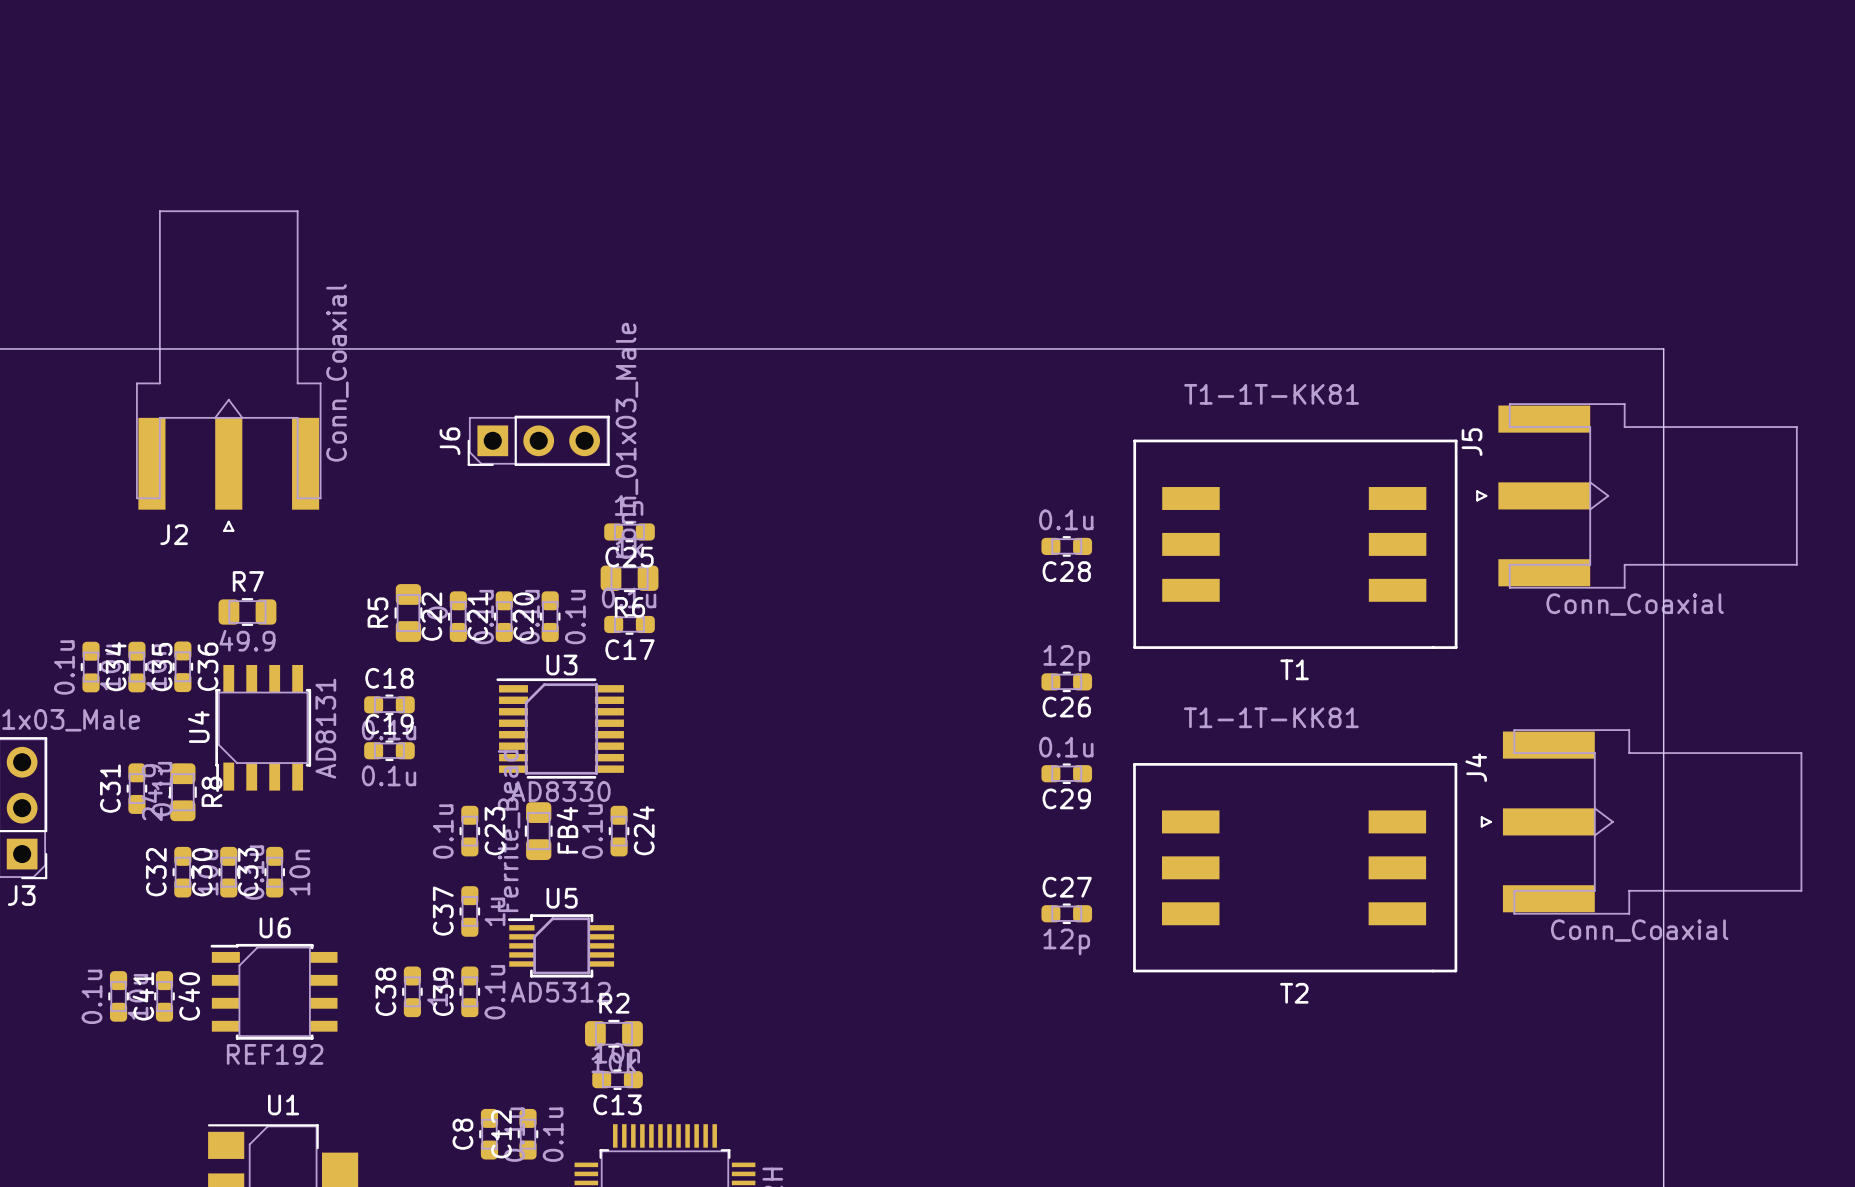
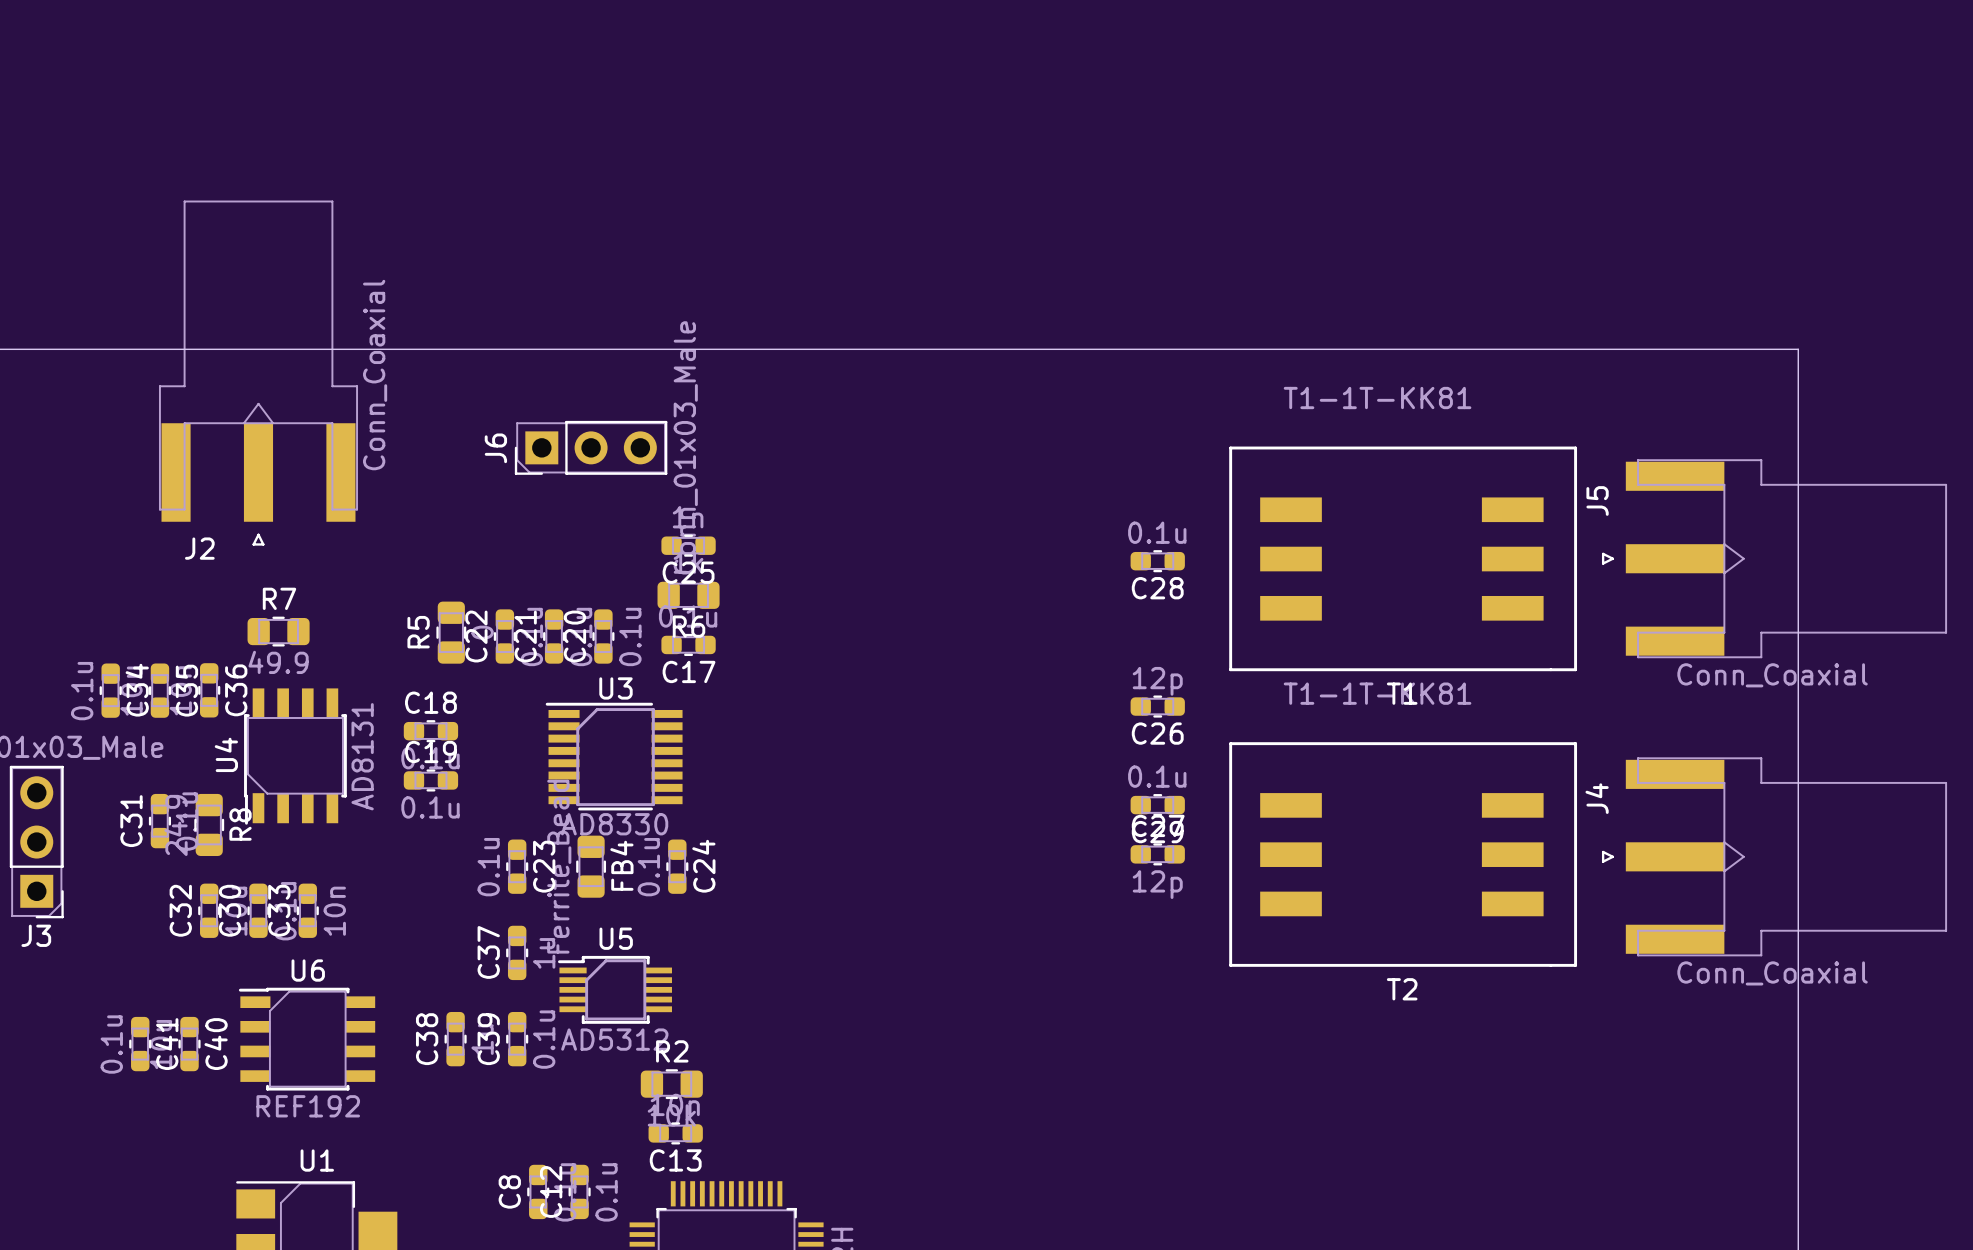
J5 position: (1636, 495) -> (1774, 558)
T2 position: (1295, 867) -> (1403, 854)
C27 position: (1066, 913) -> (1157, 854)

